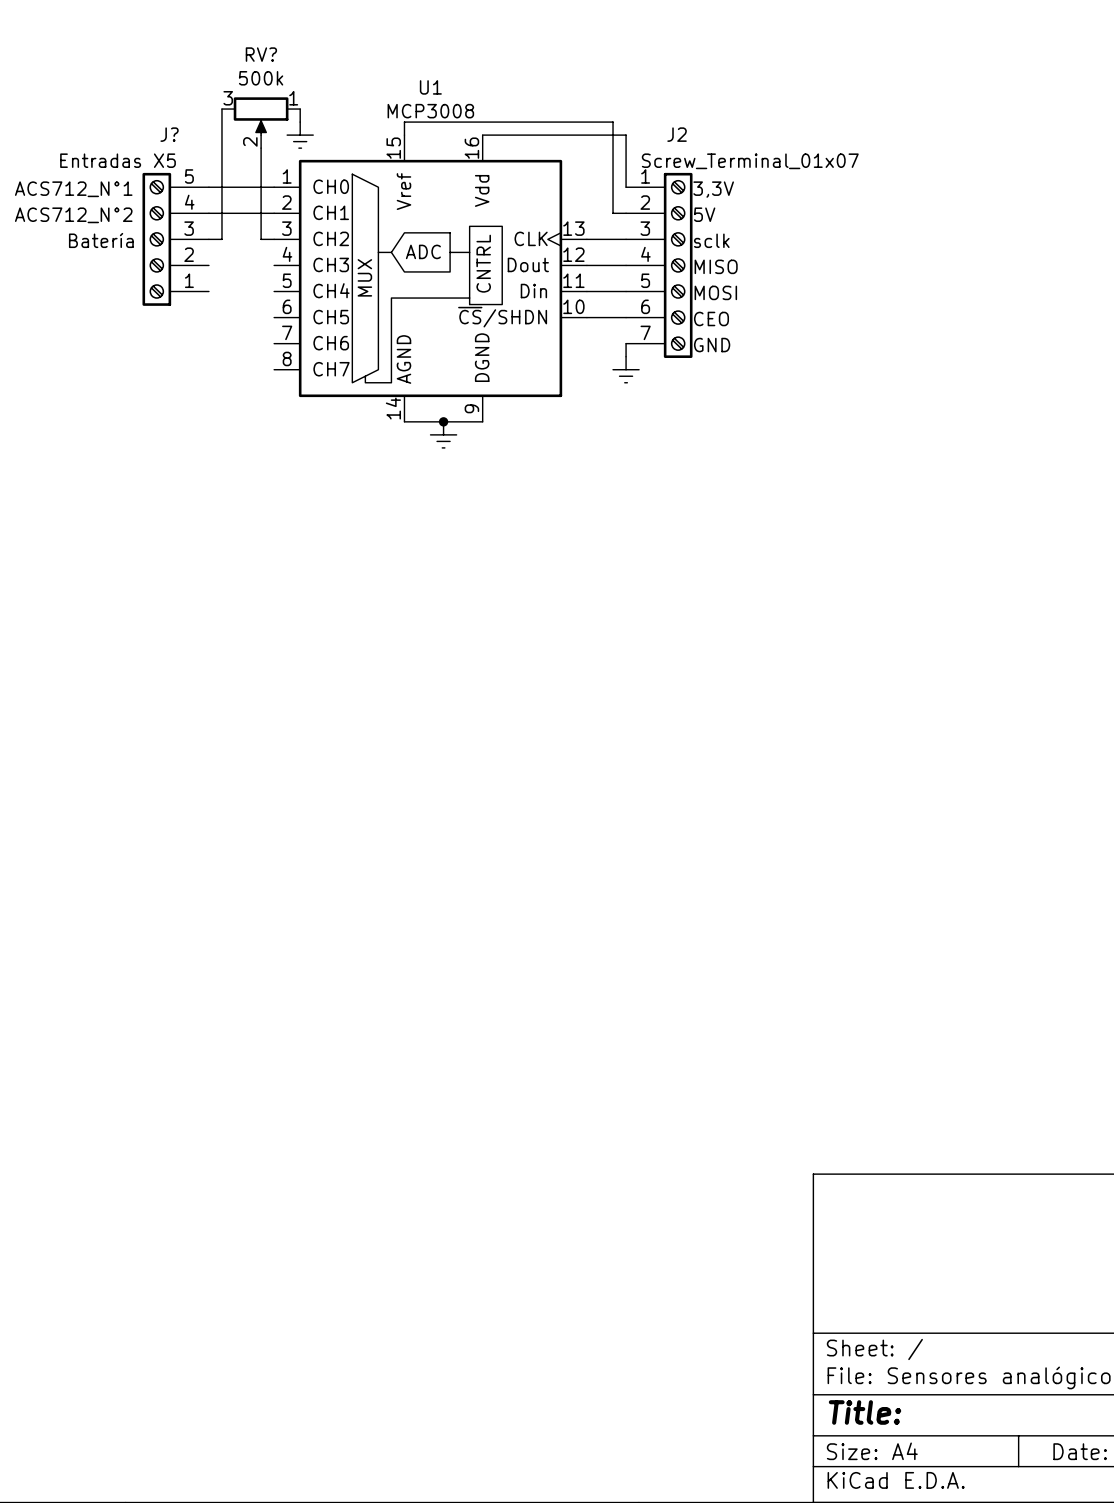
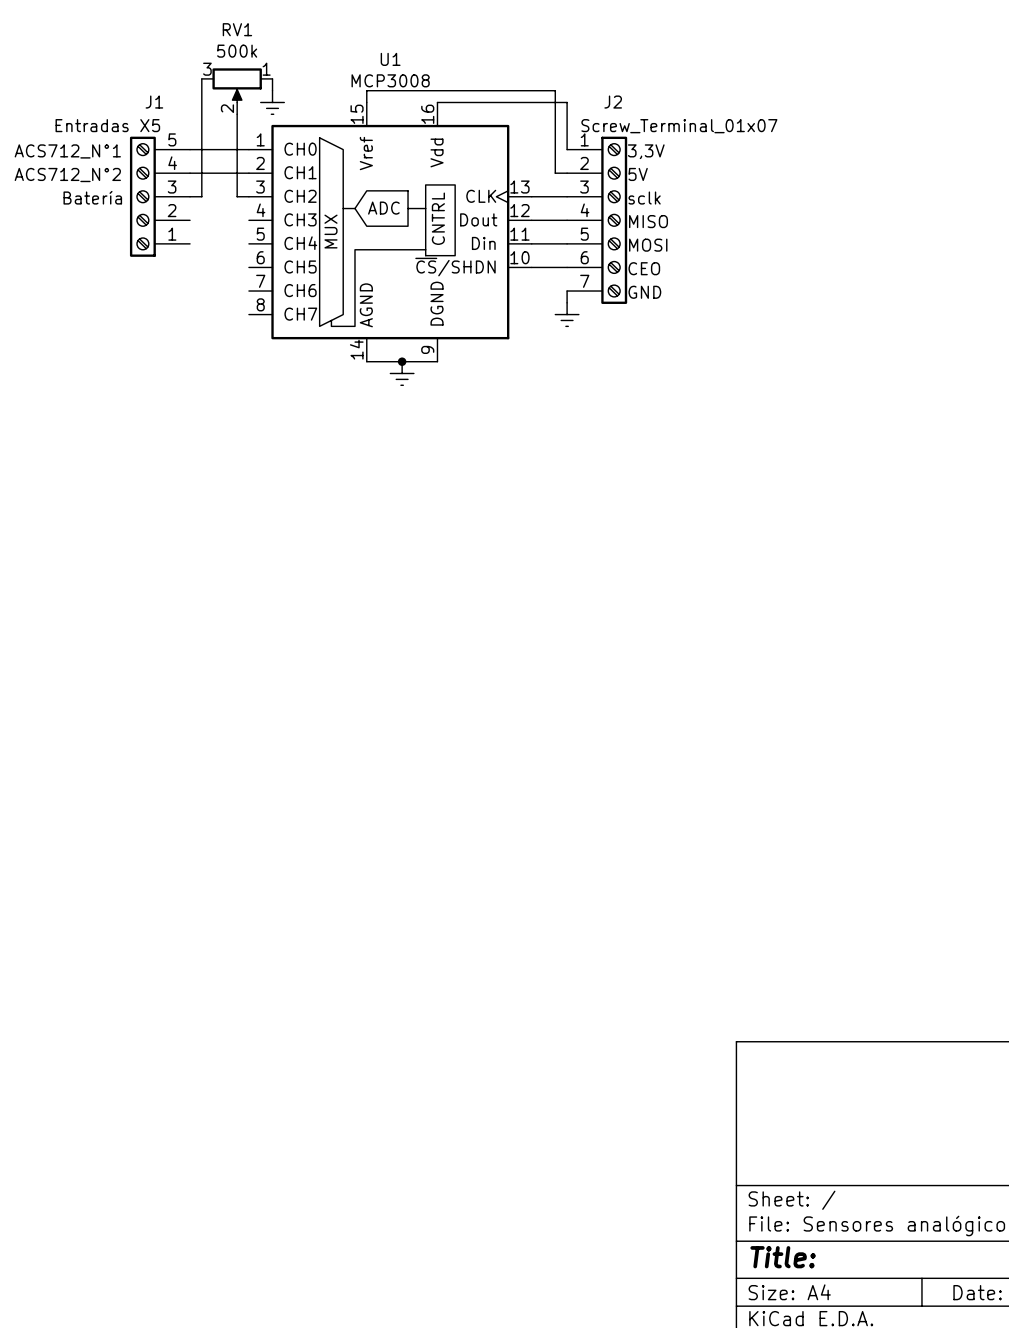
RV? name: RV? (261, 54) -> RV1 (237, 29)
J? name: J? (169, 134) -> J1 (154, 102)

